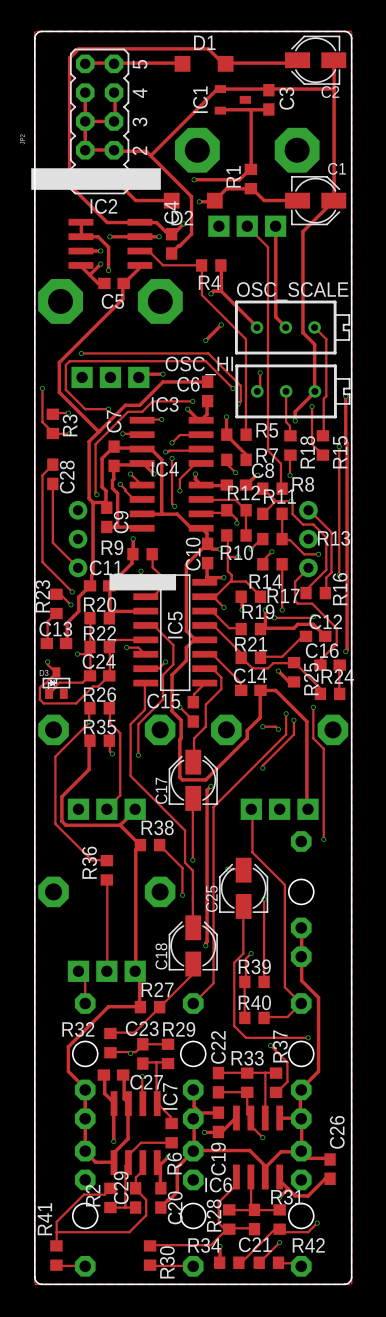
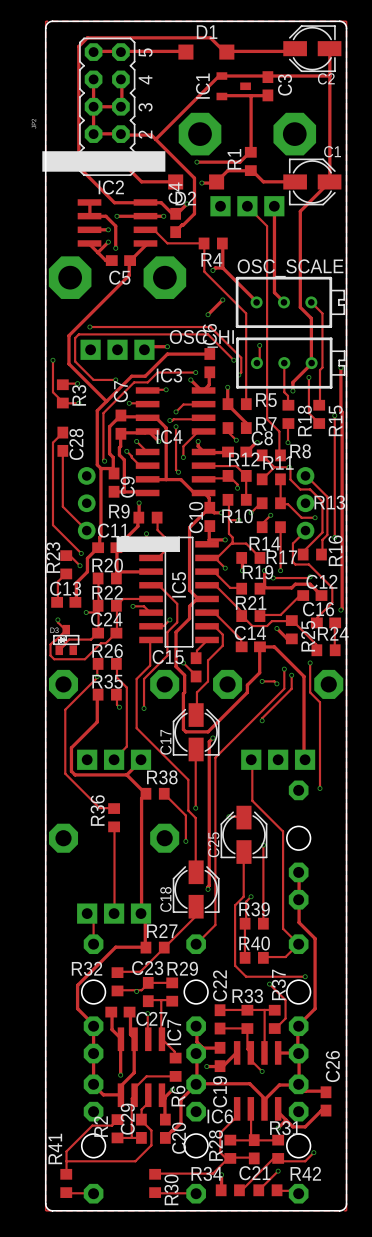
C6 name rotation: 0° (188, 384) -> 90° counterclockwise (209, 334)
C6 name position: C6 (188, 384) -> C6 (209, 334)

